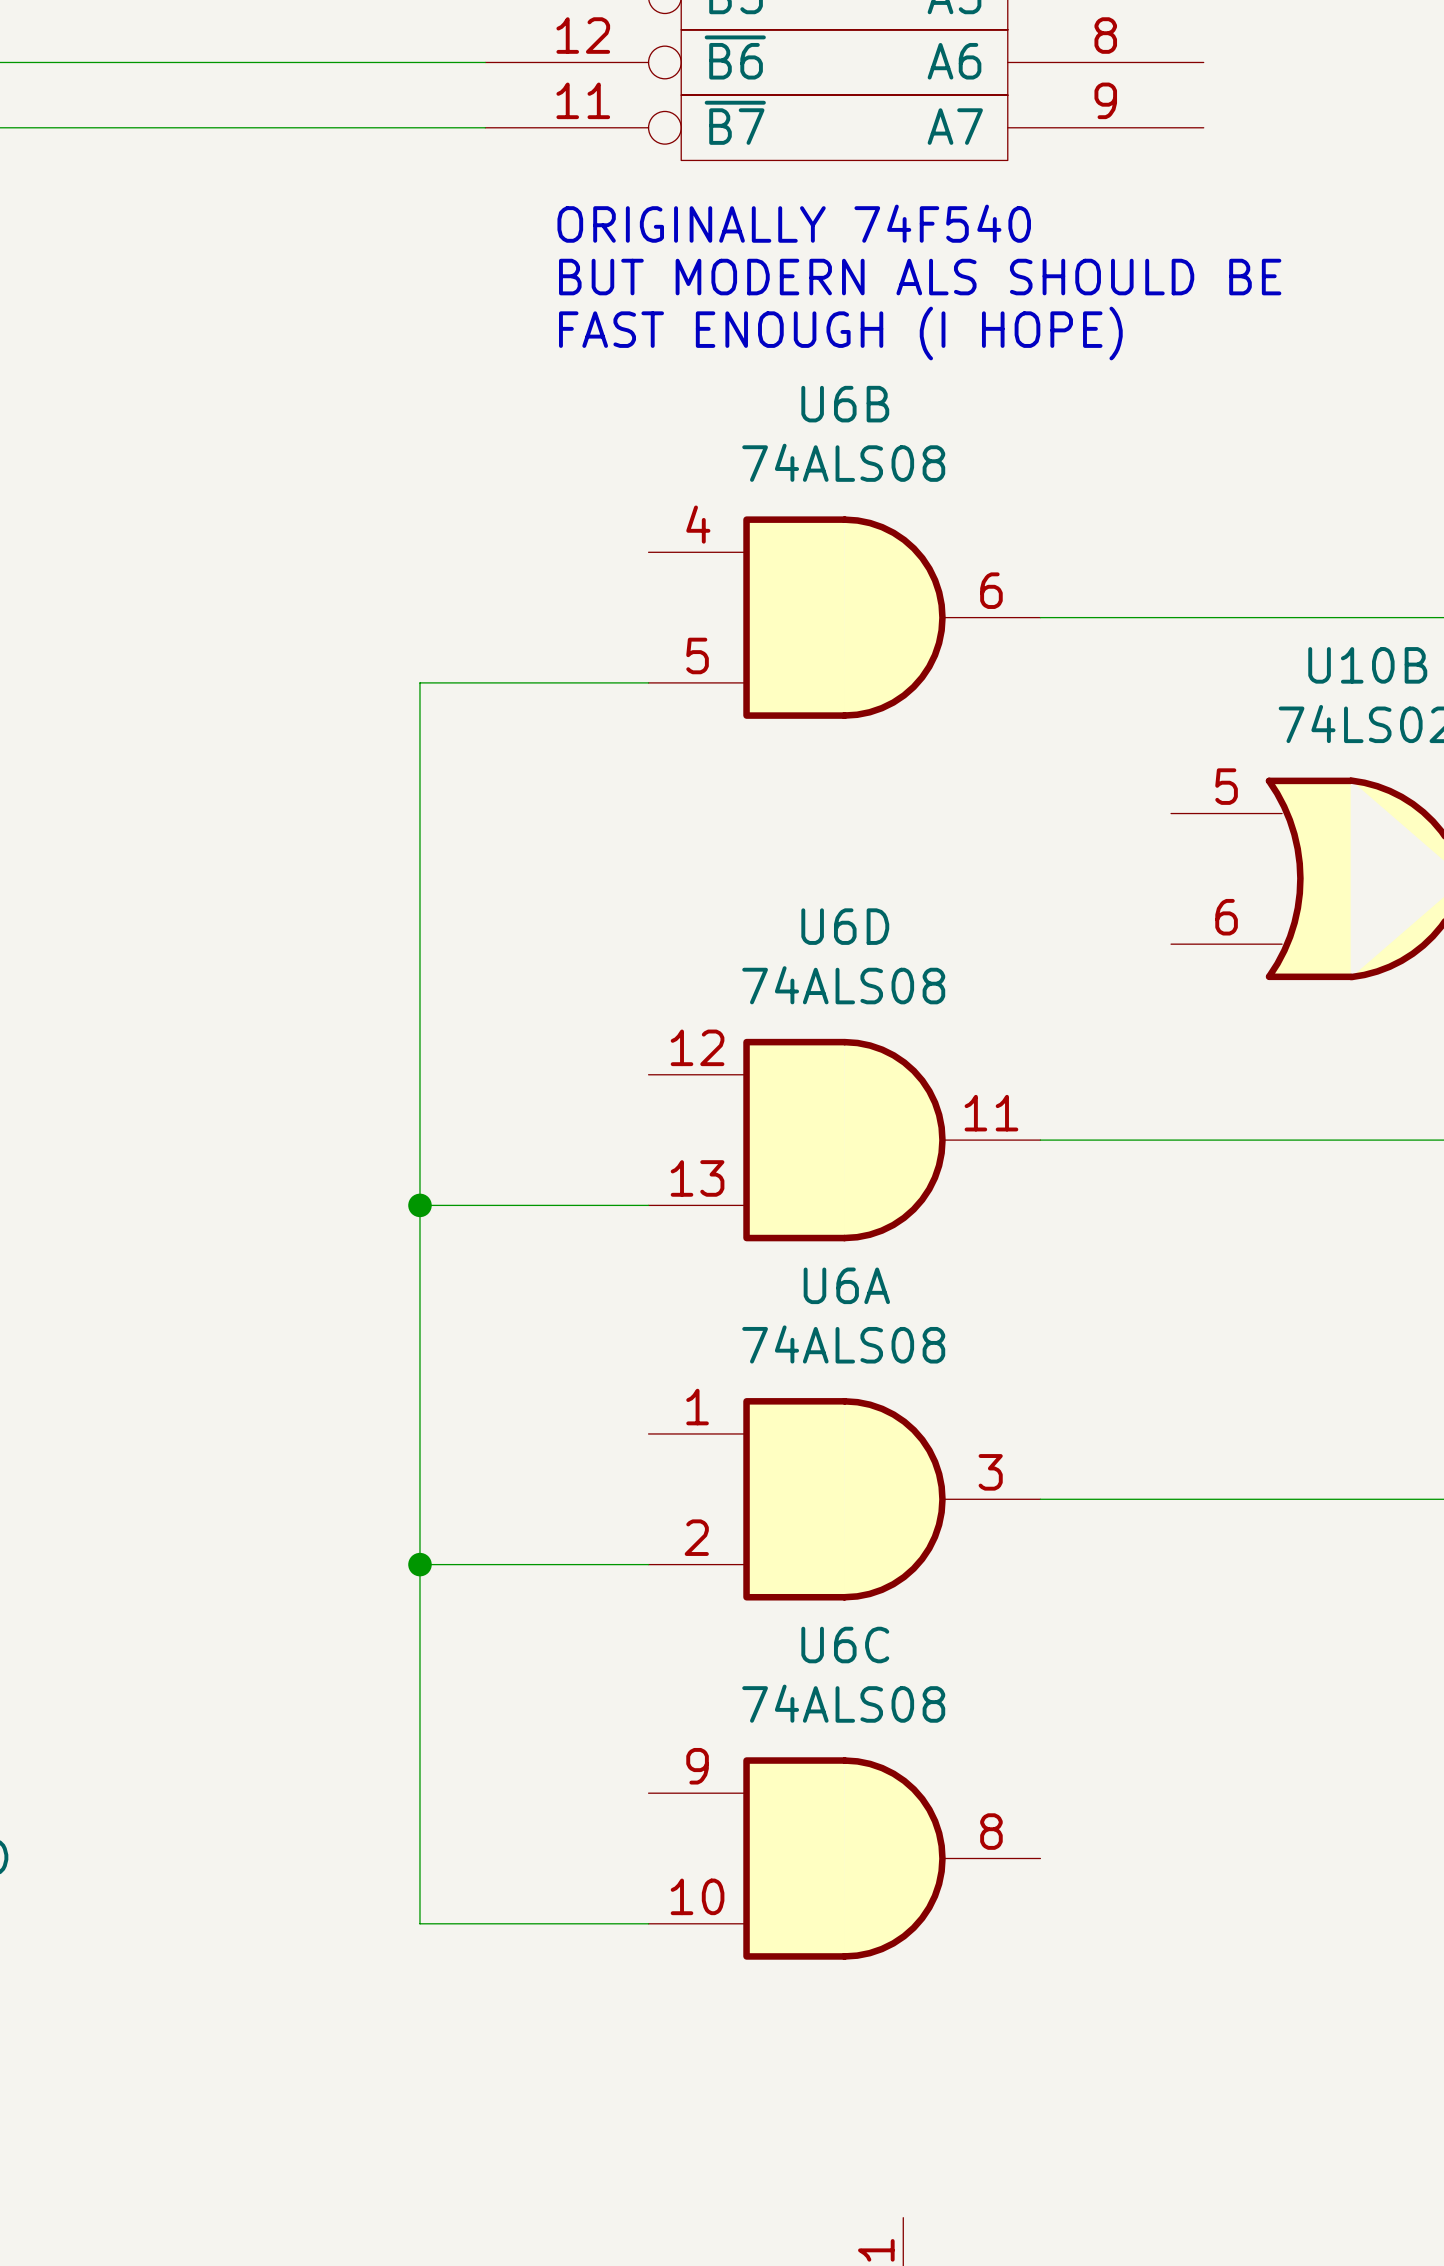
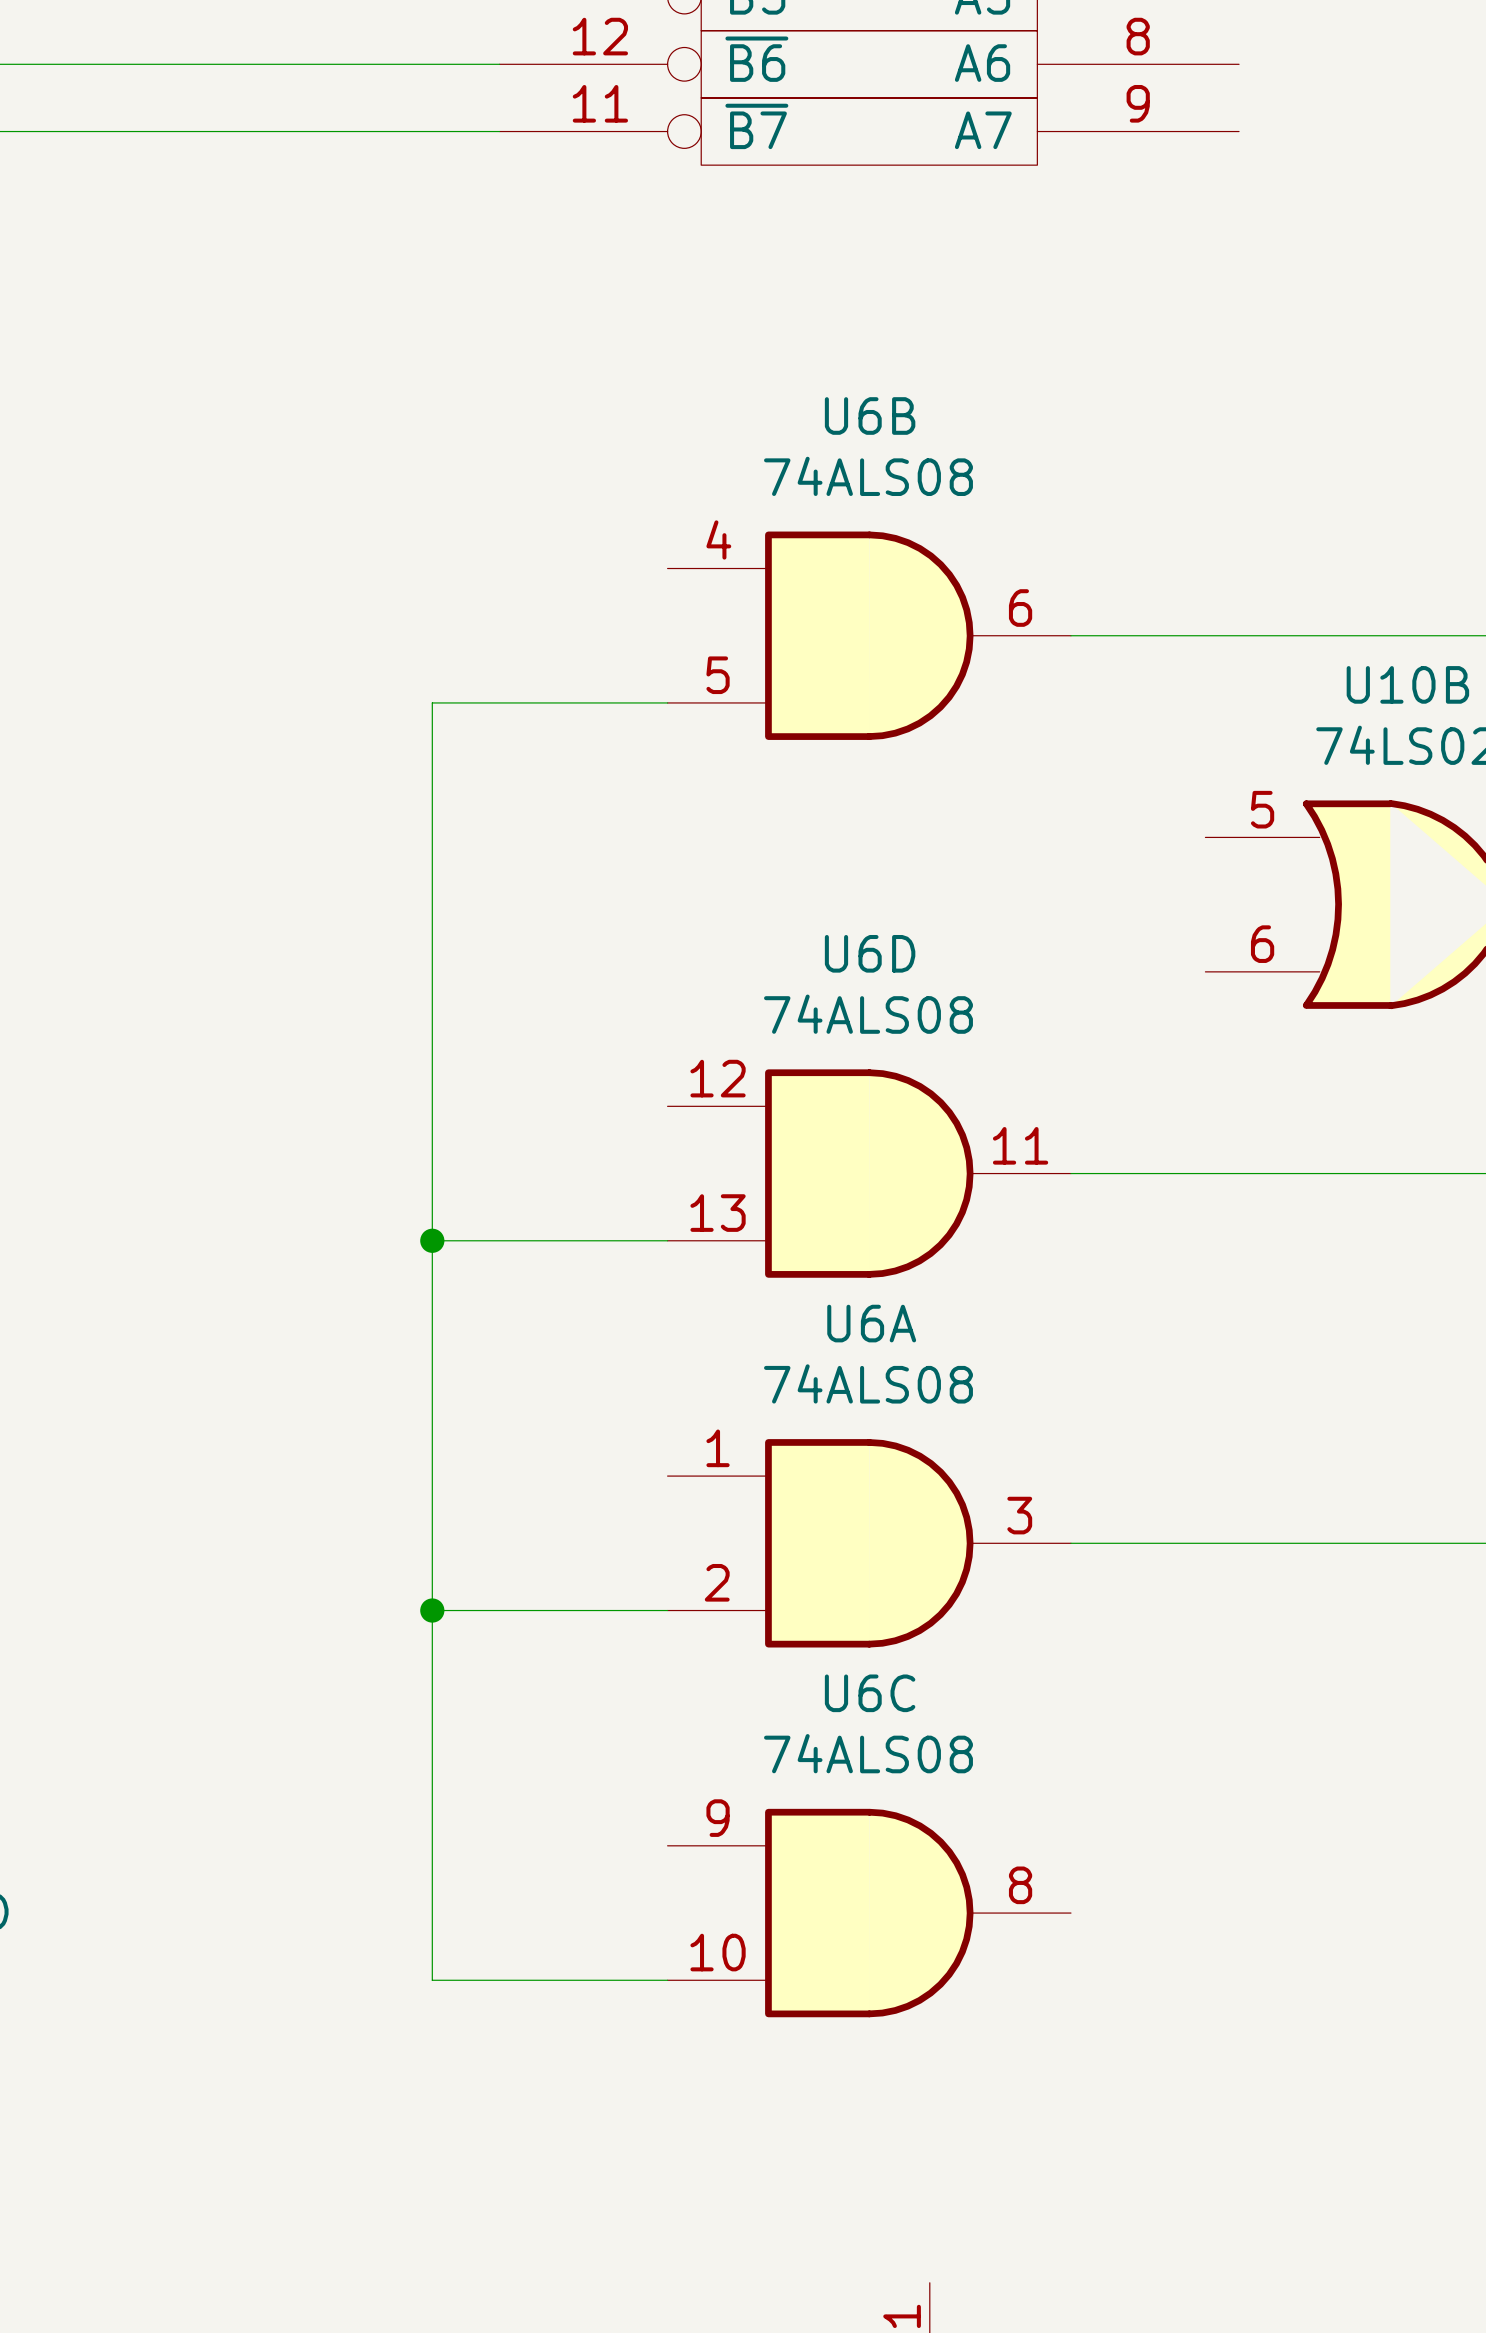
text: ORIGINALLY 74F540 (794, 223) -> none
text: BUT MODERN ALS SHOULD BE (920, 277) -> none
text: FAST ENOUGH (I HOPE) (840, 333) -> none

